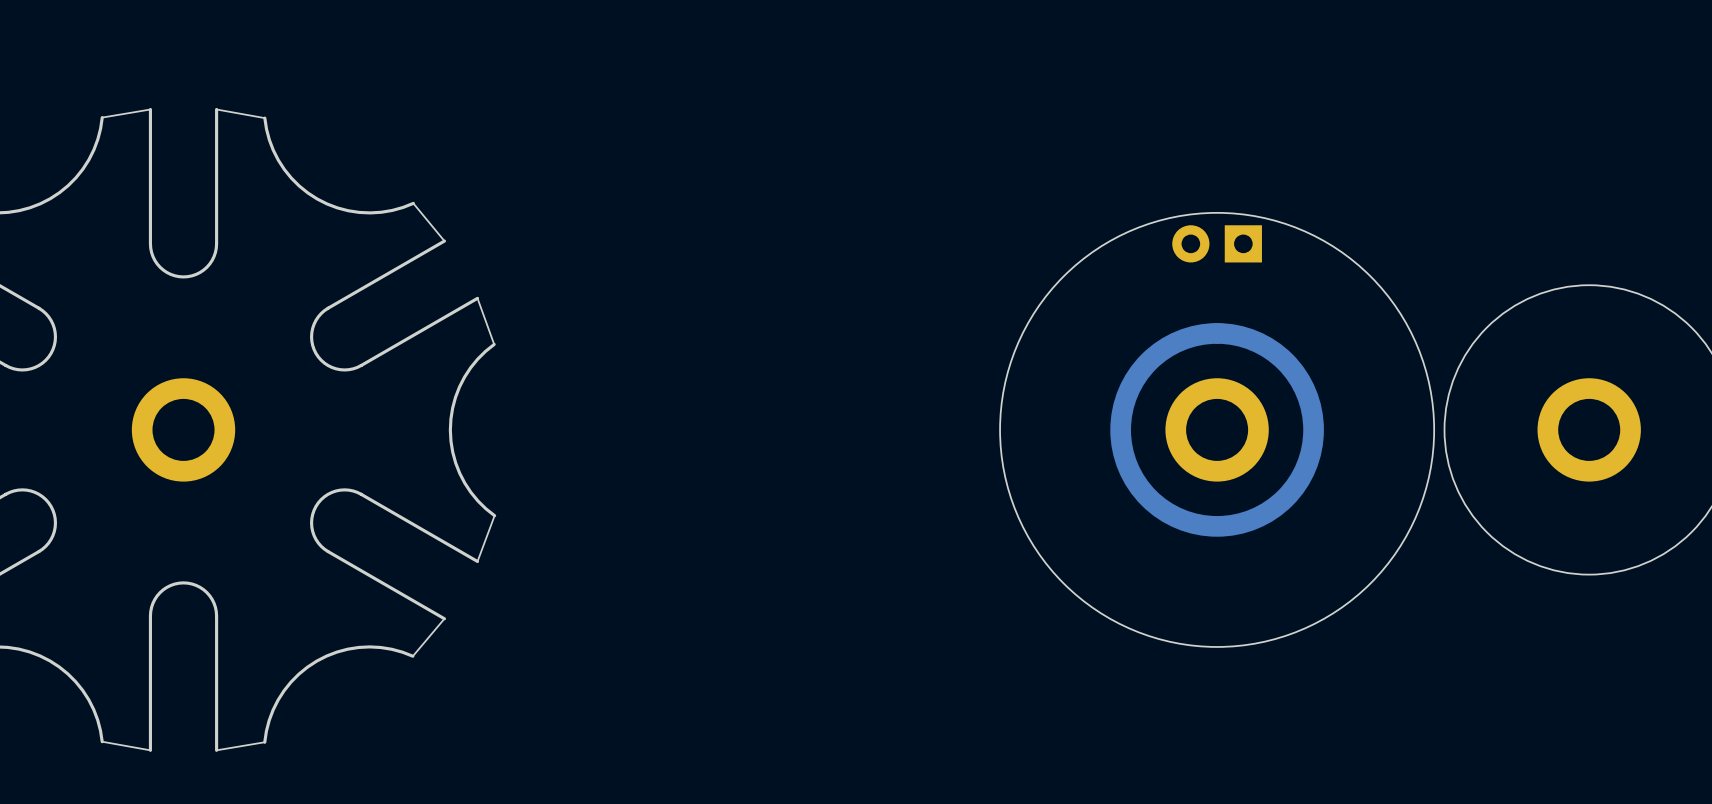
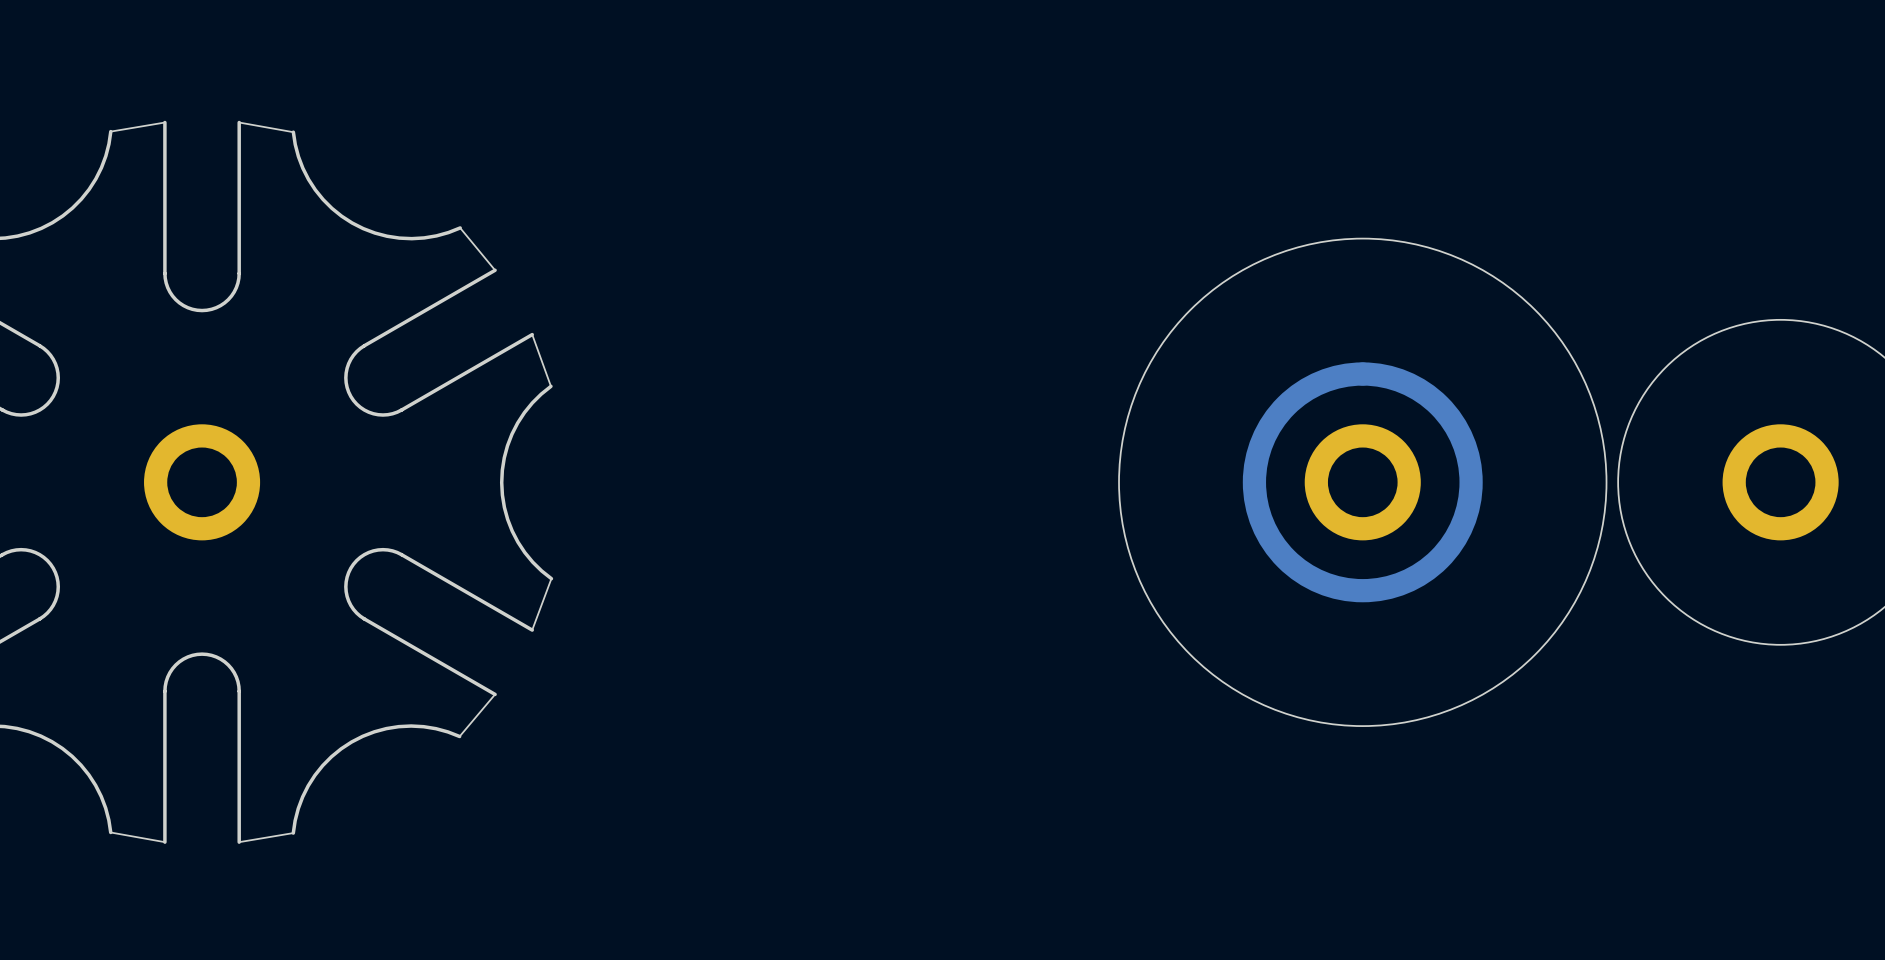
part: (1217, 243) -> none

